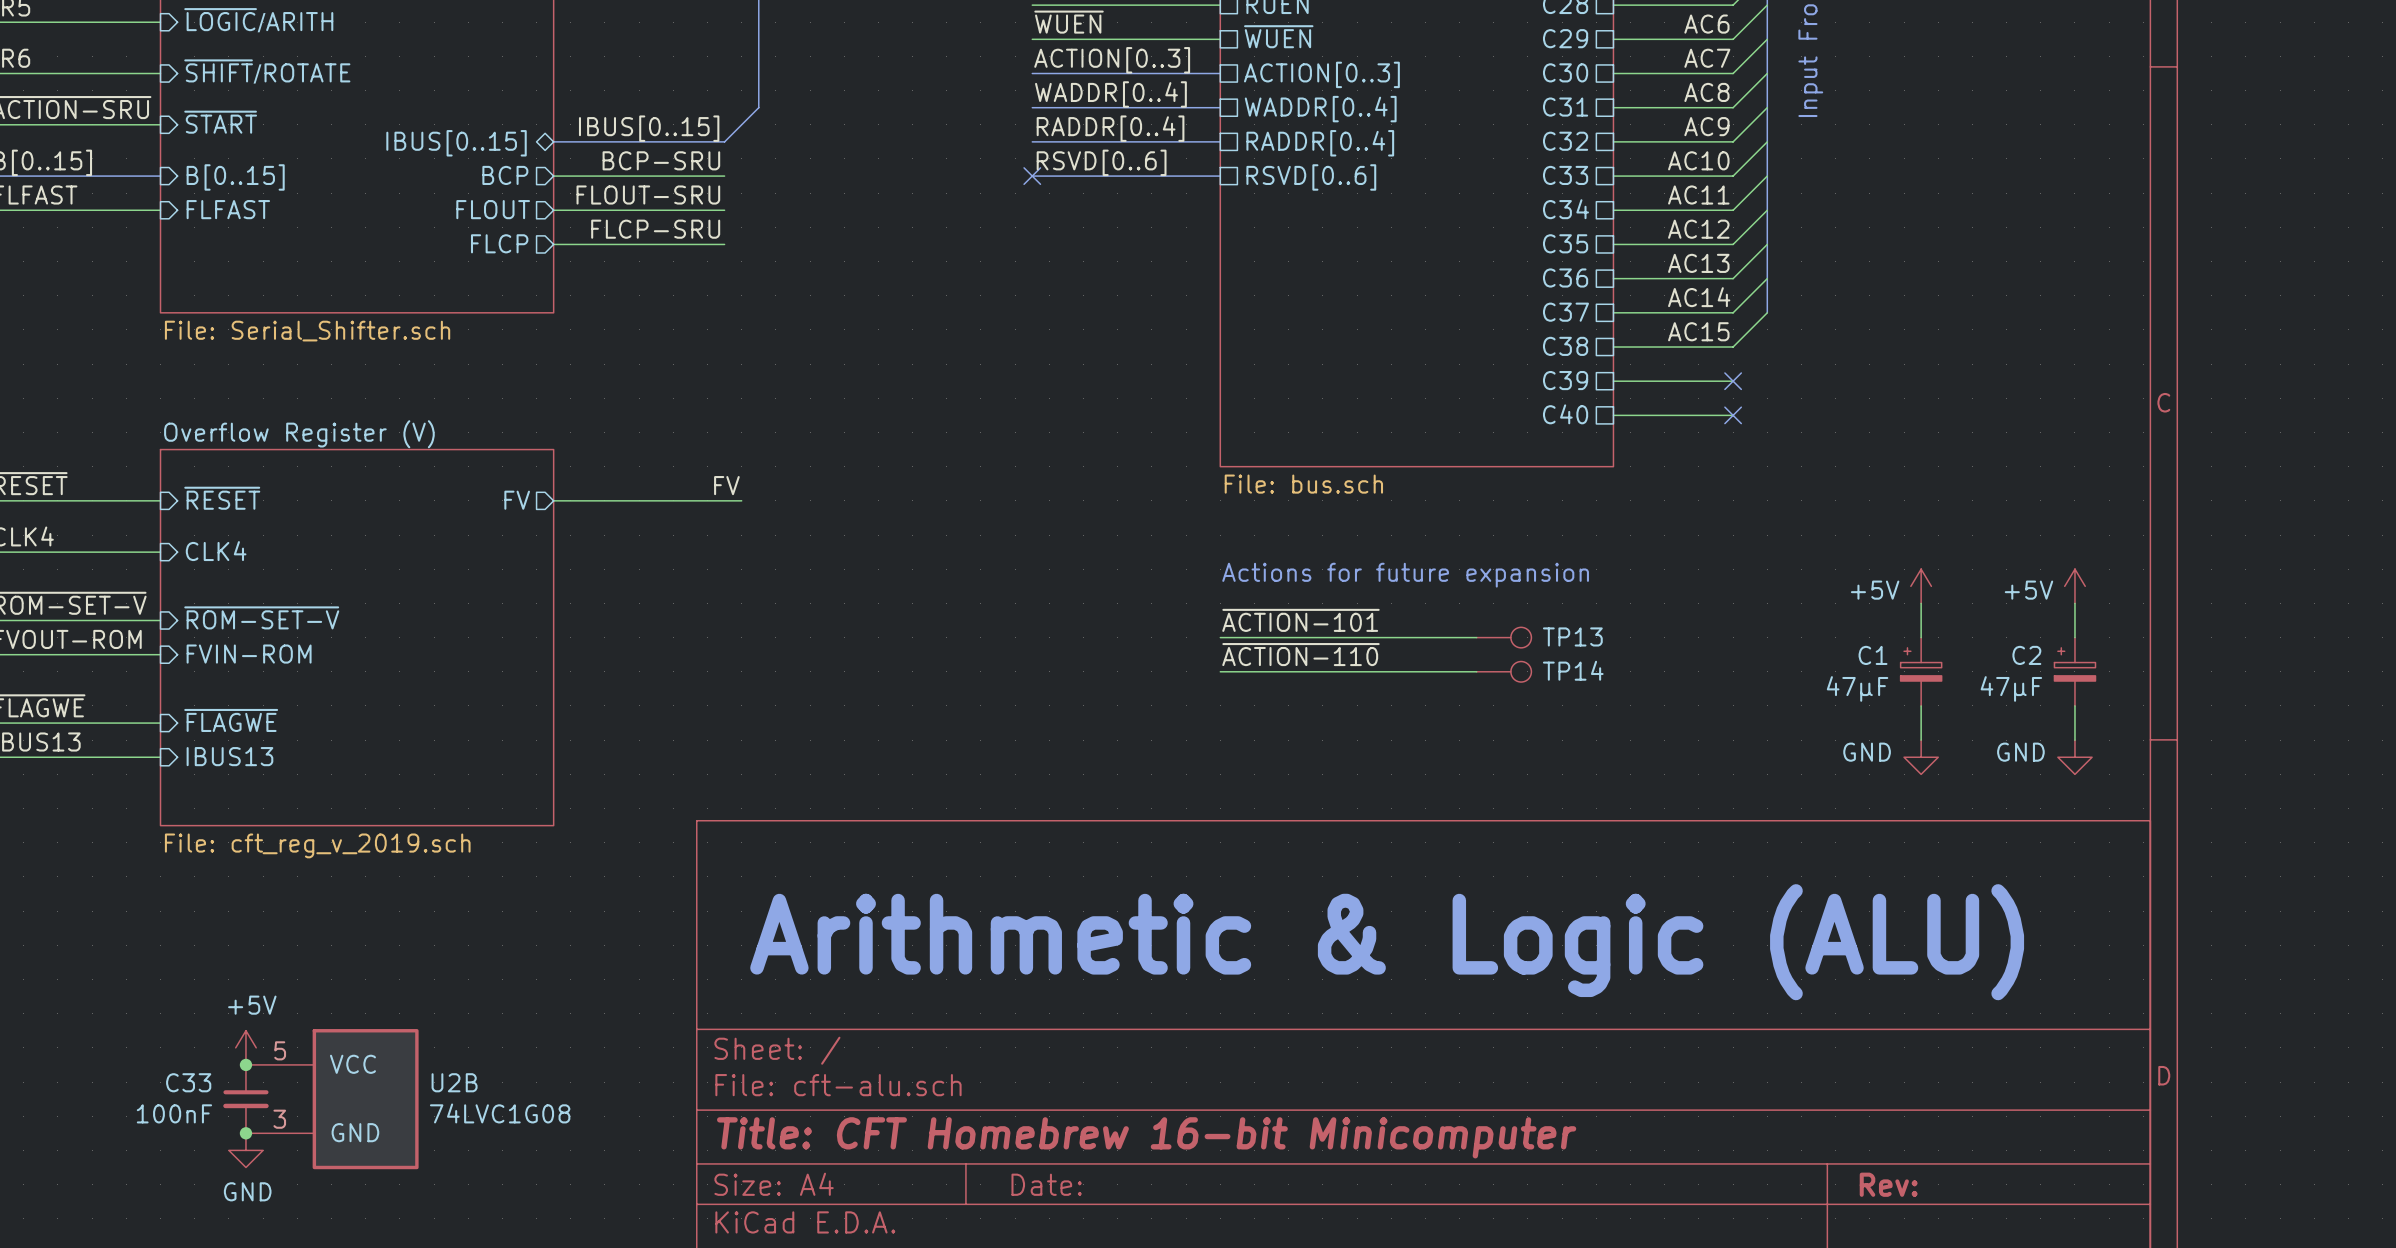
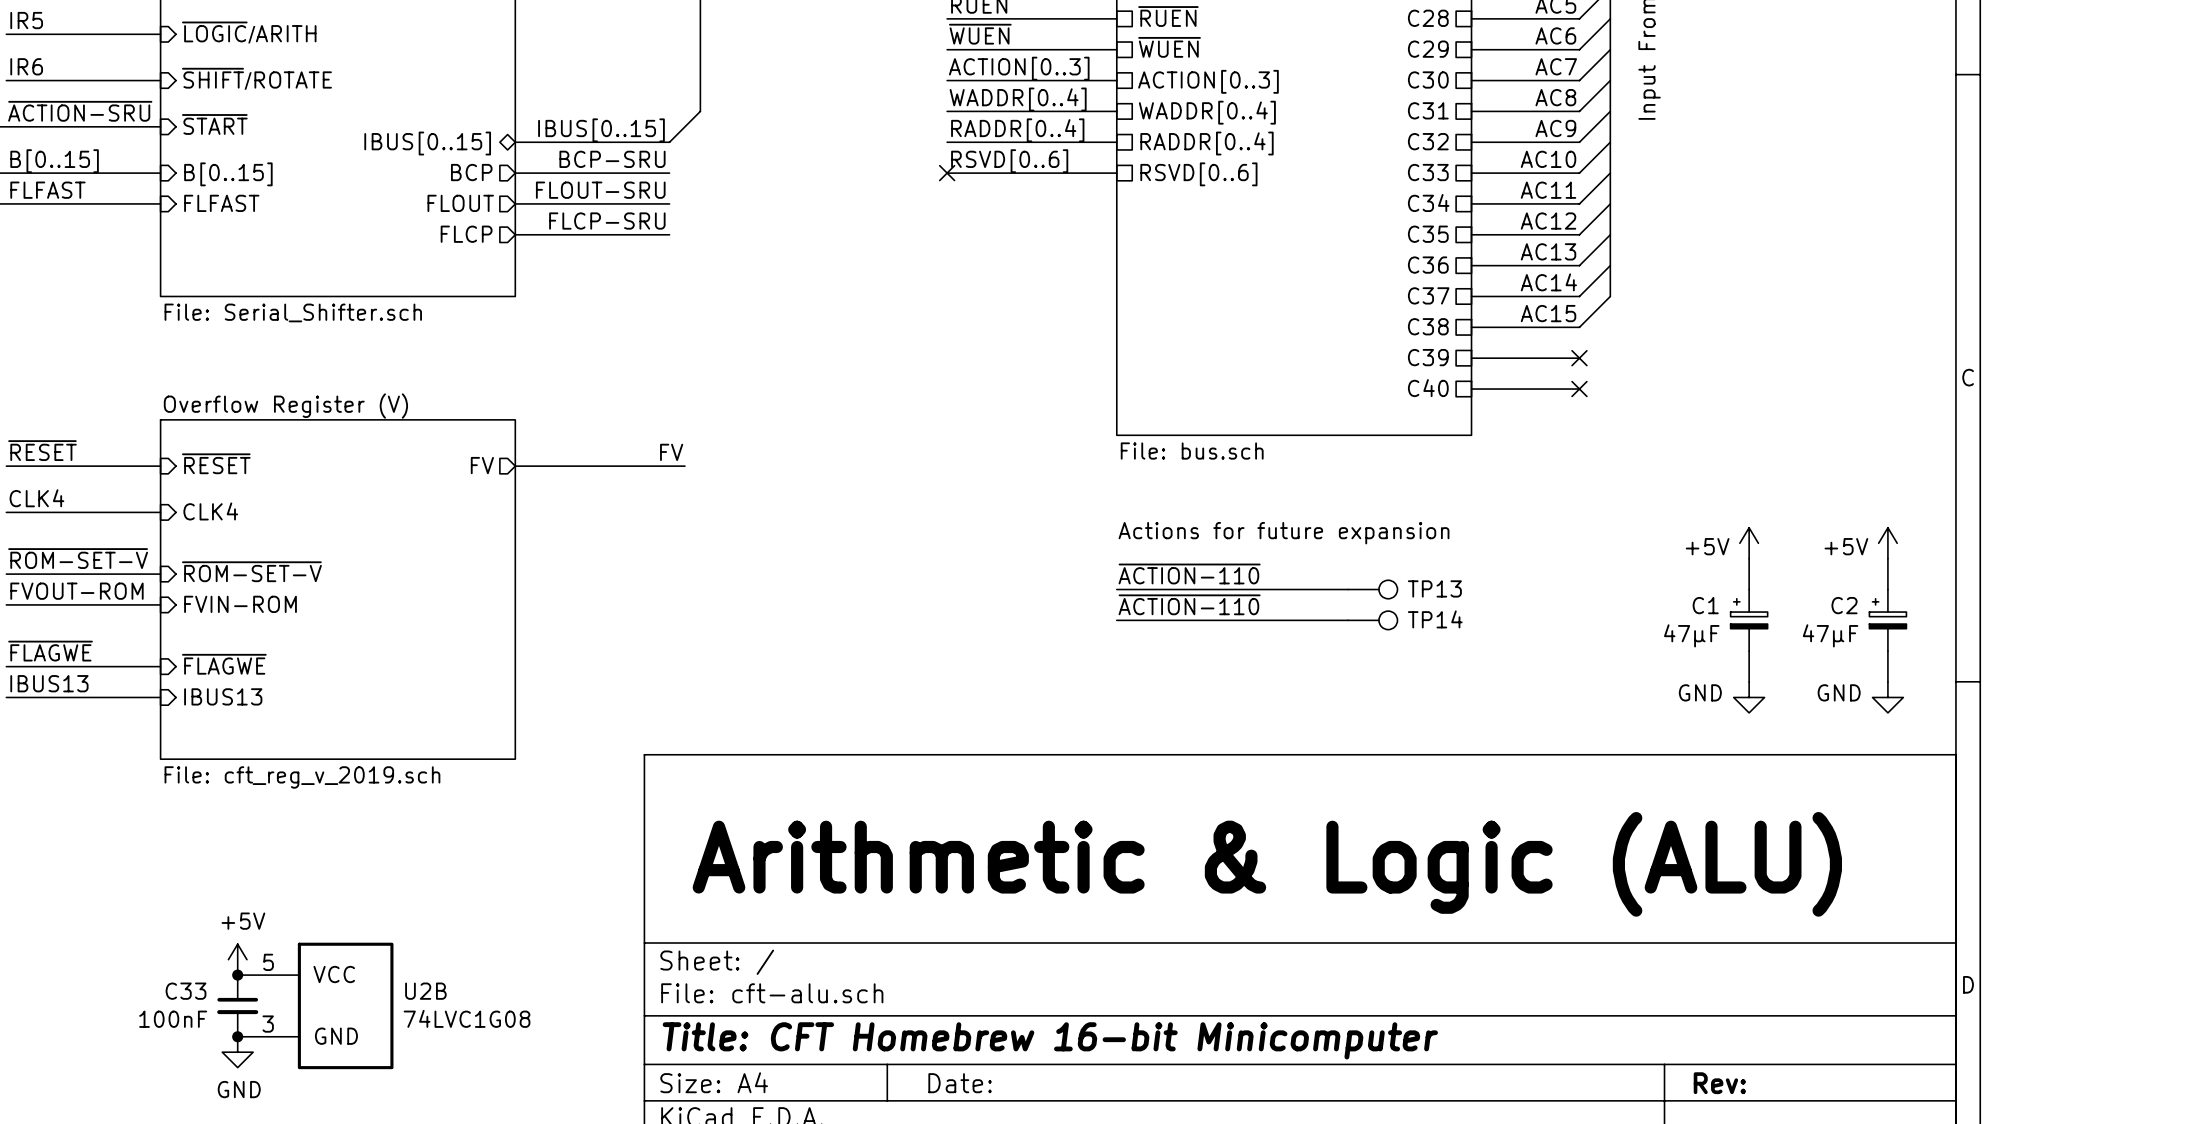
label: ~{ACTION-101} (1300, 620) -> ~{ACTION-110} (1189, 573)

